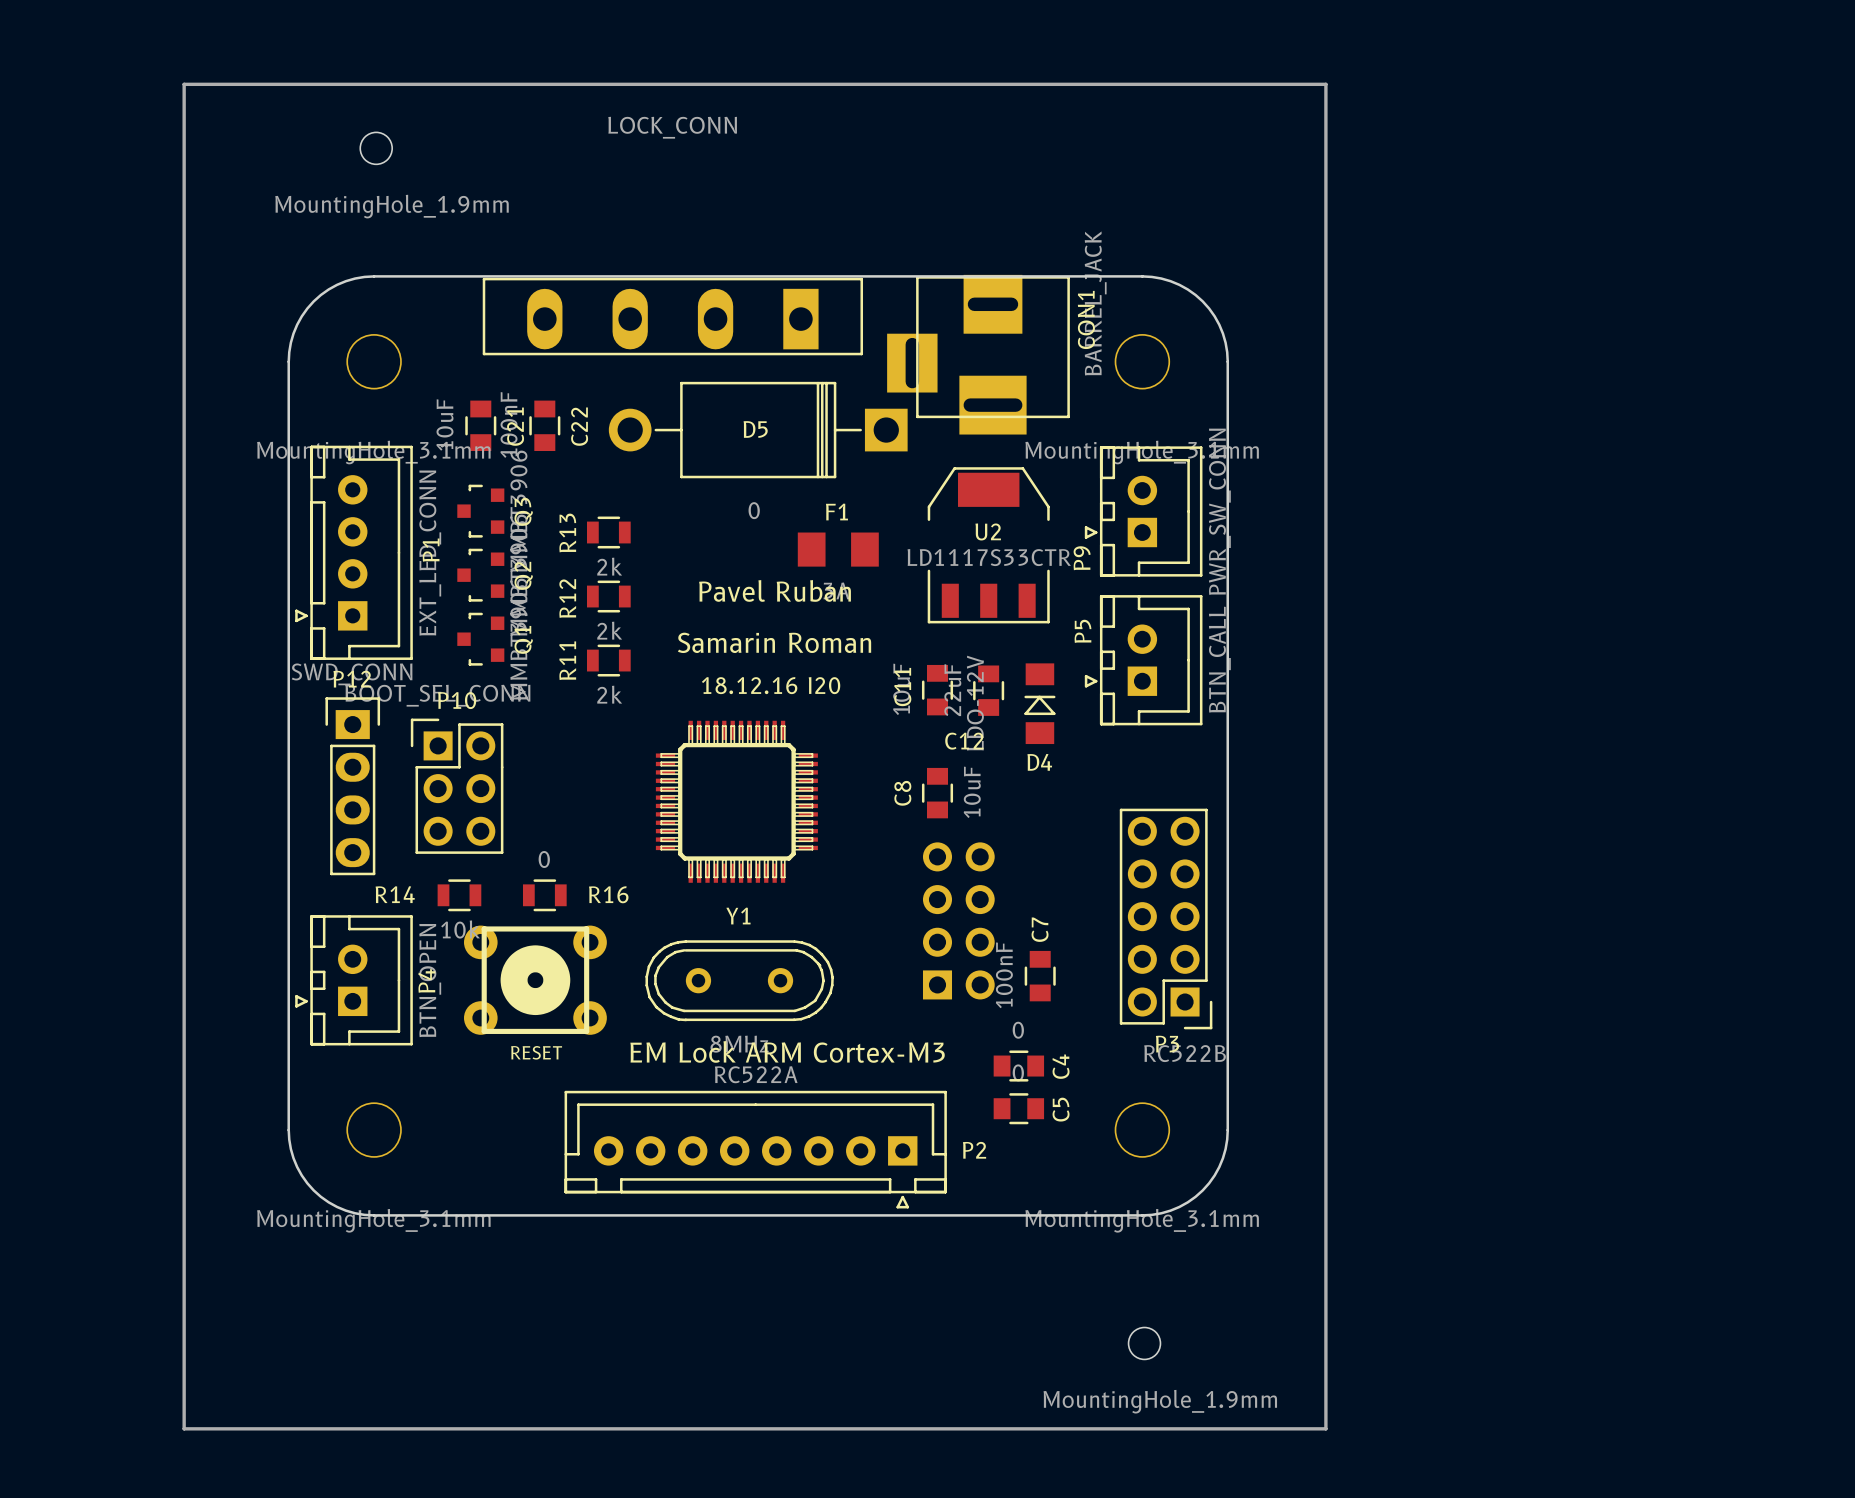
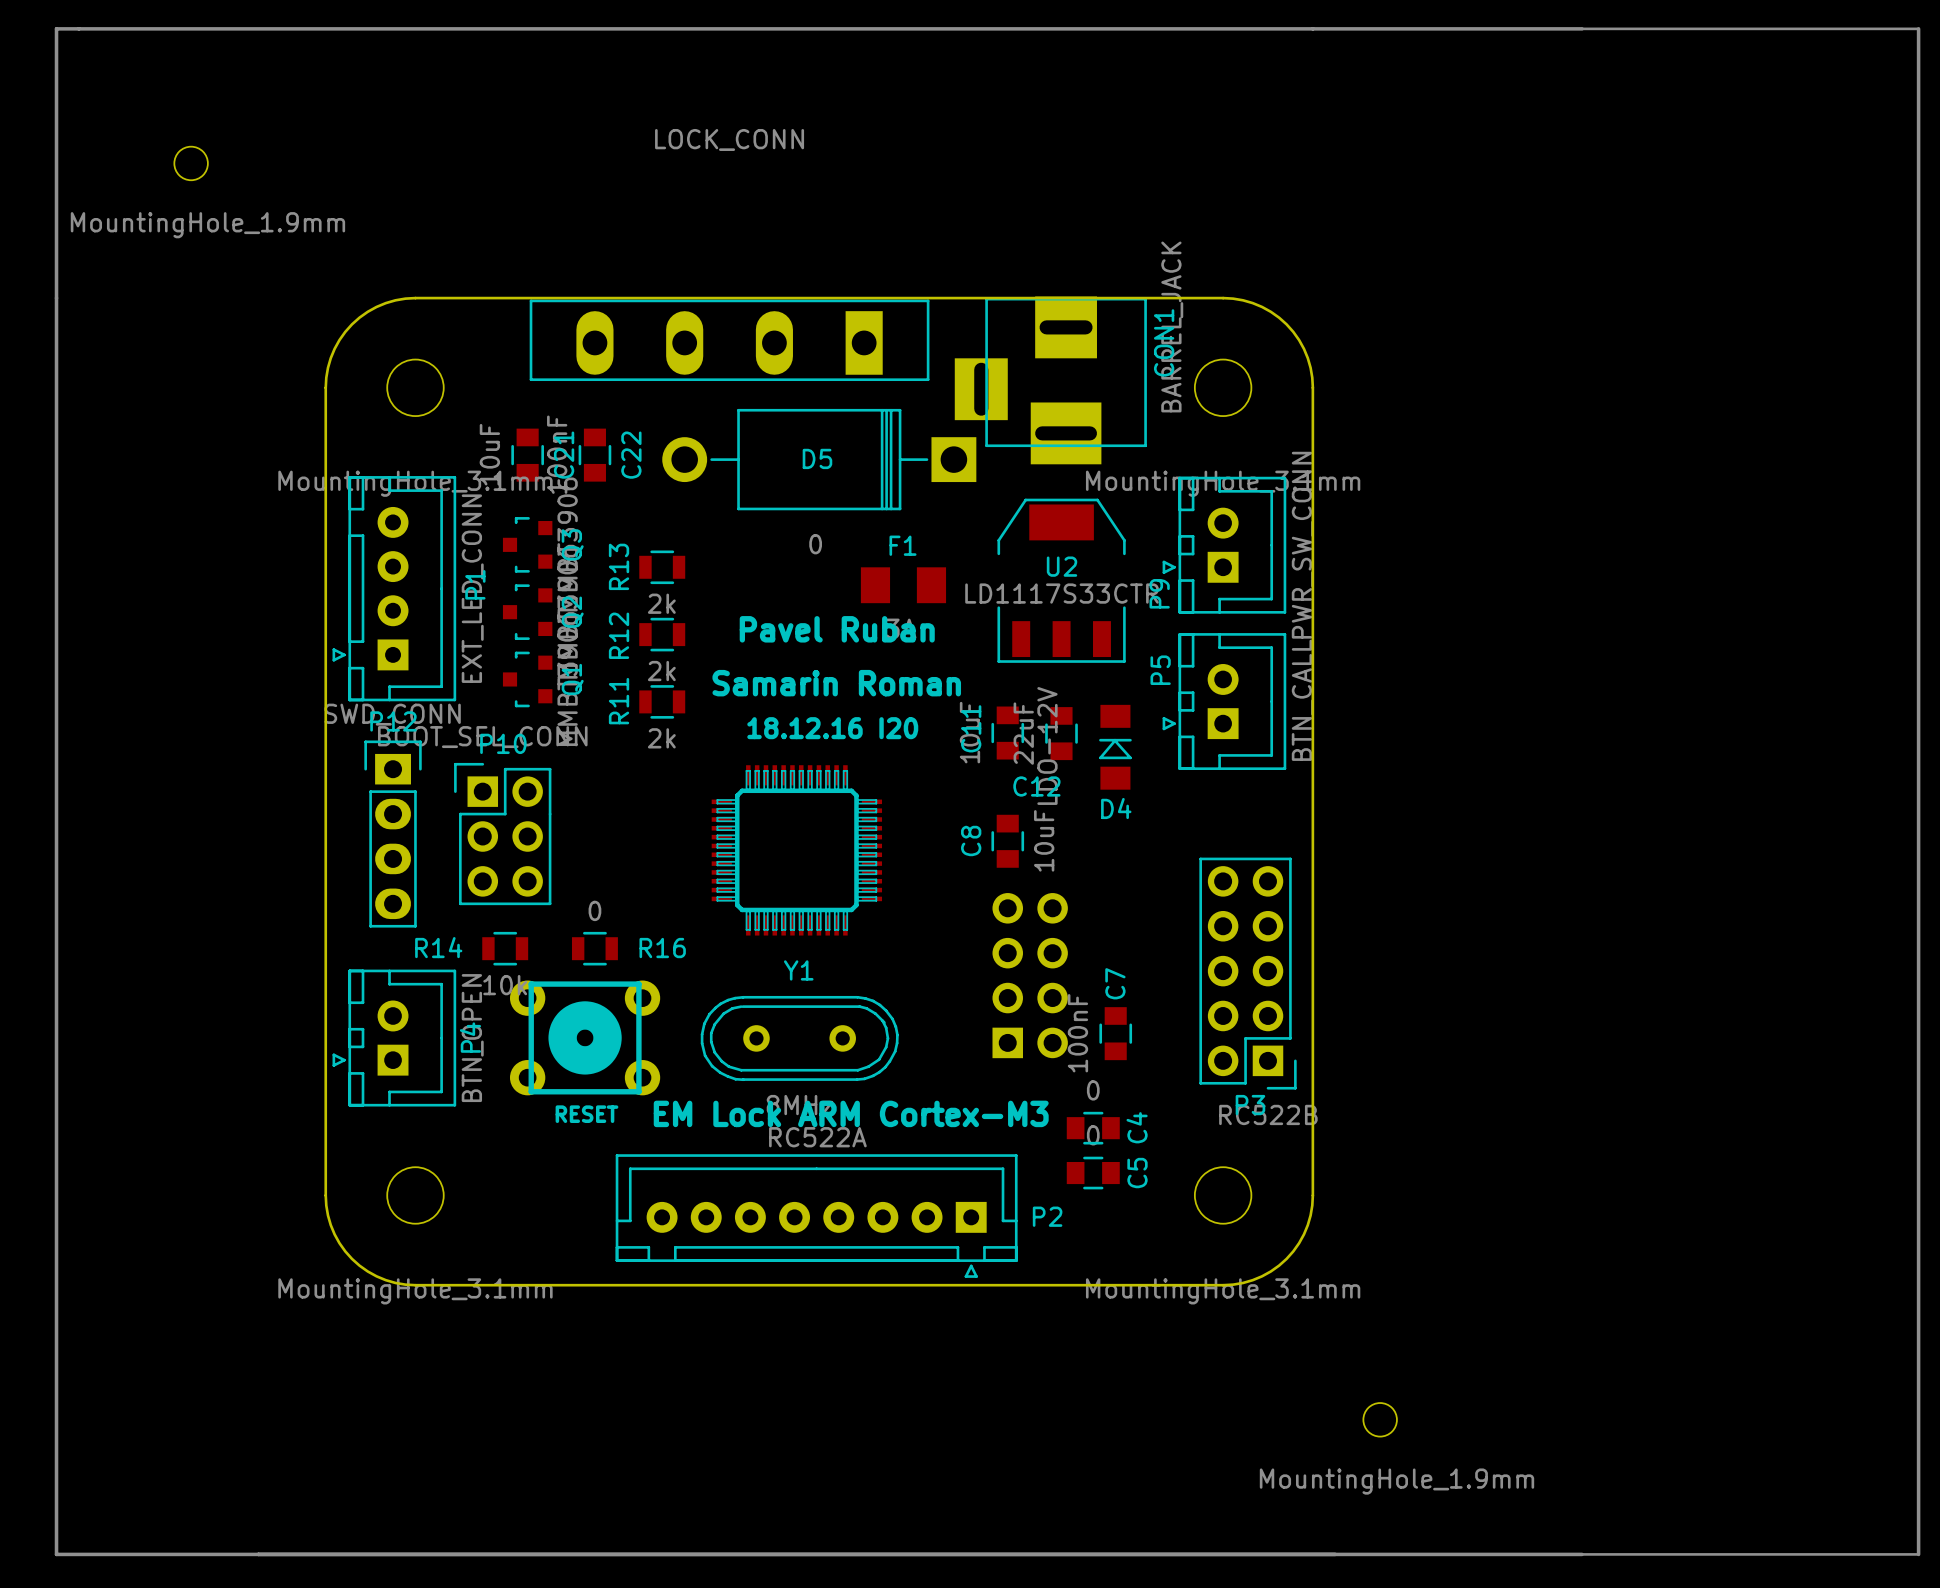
line: (184, 84) (1325, 84) (1325, 1428) (184, 1428) (184, 84) -> (56, 28) (56, 1554) (1918, 1554) (1918, 28) (56, 28)
part position: (376, 148) -> (191, 163)
part position: (1144, 1343) -> (1380, 1419)

